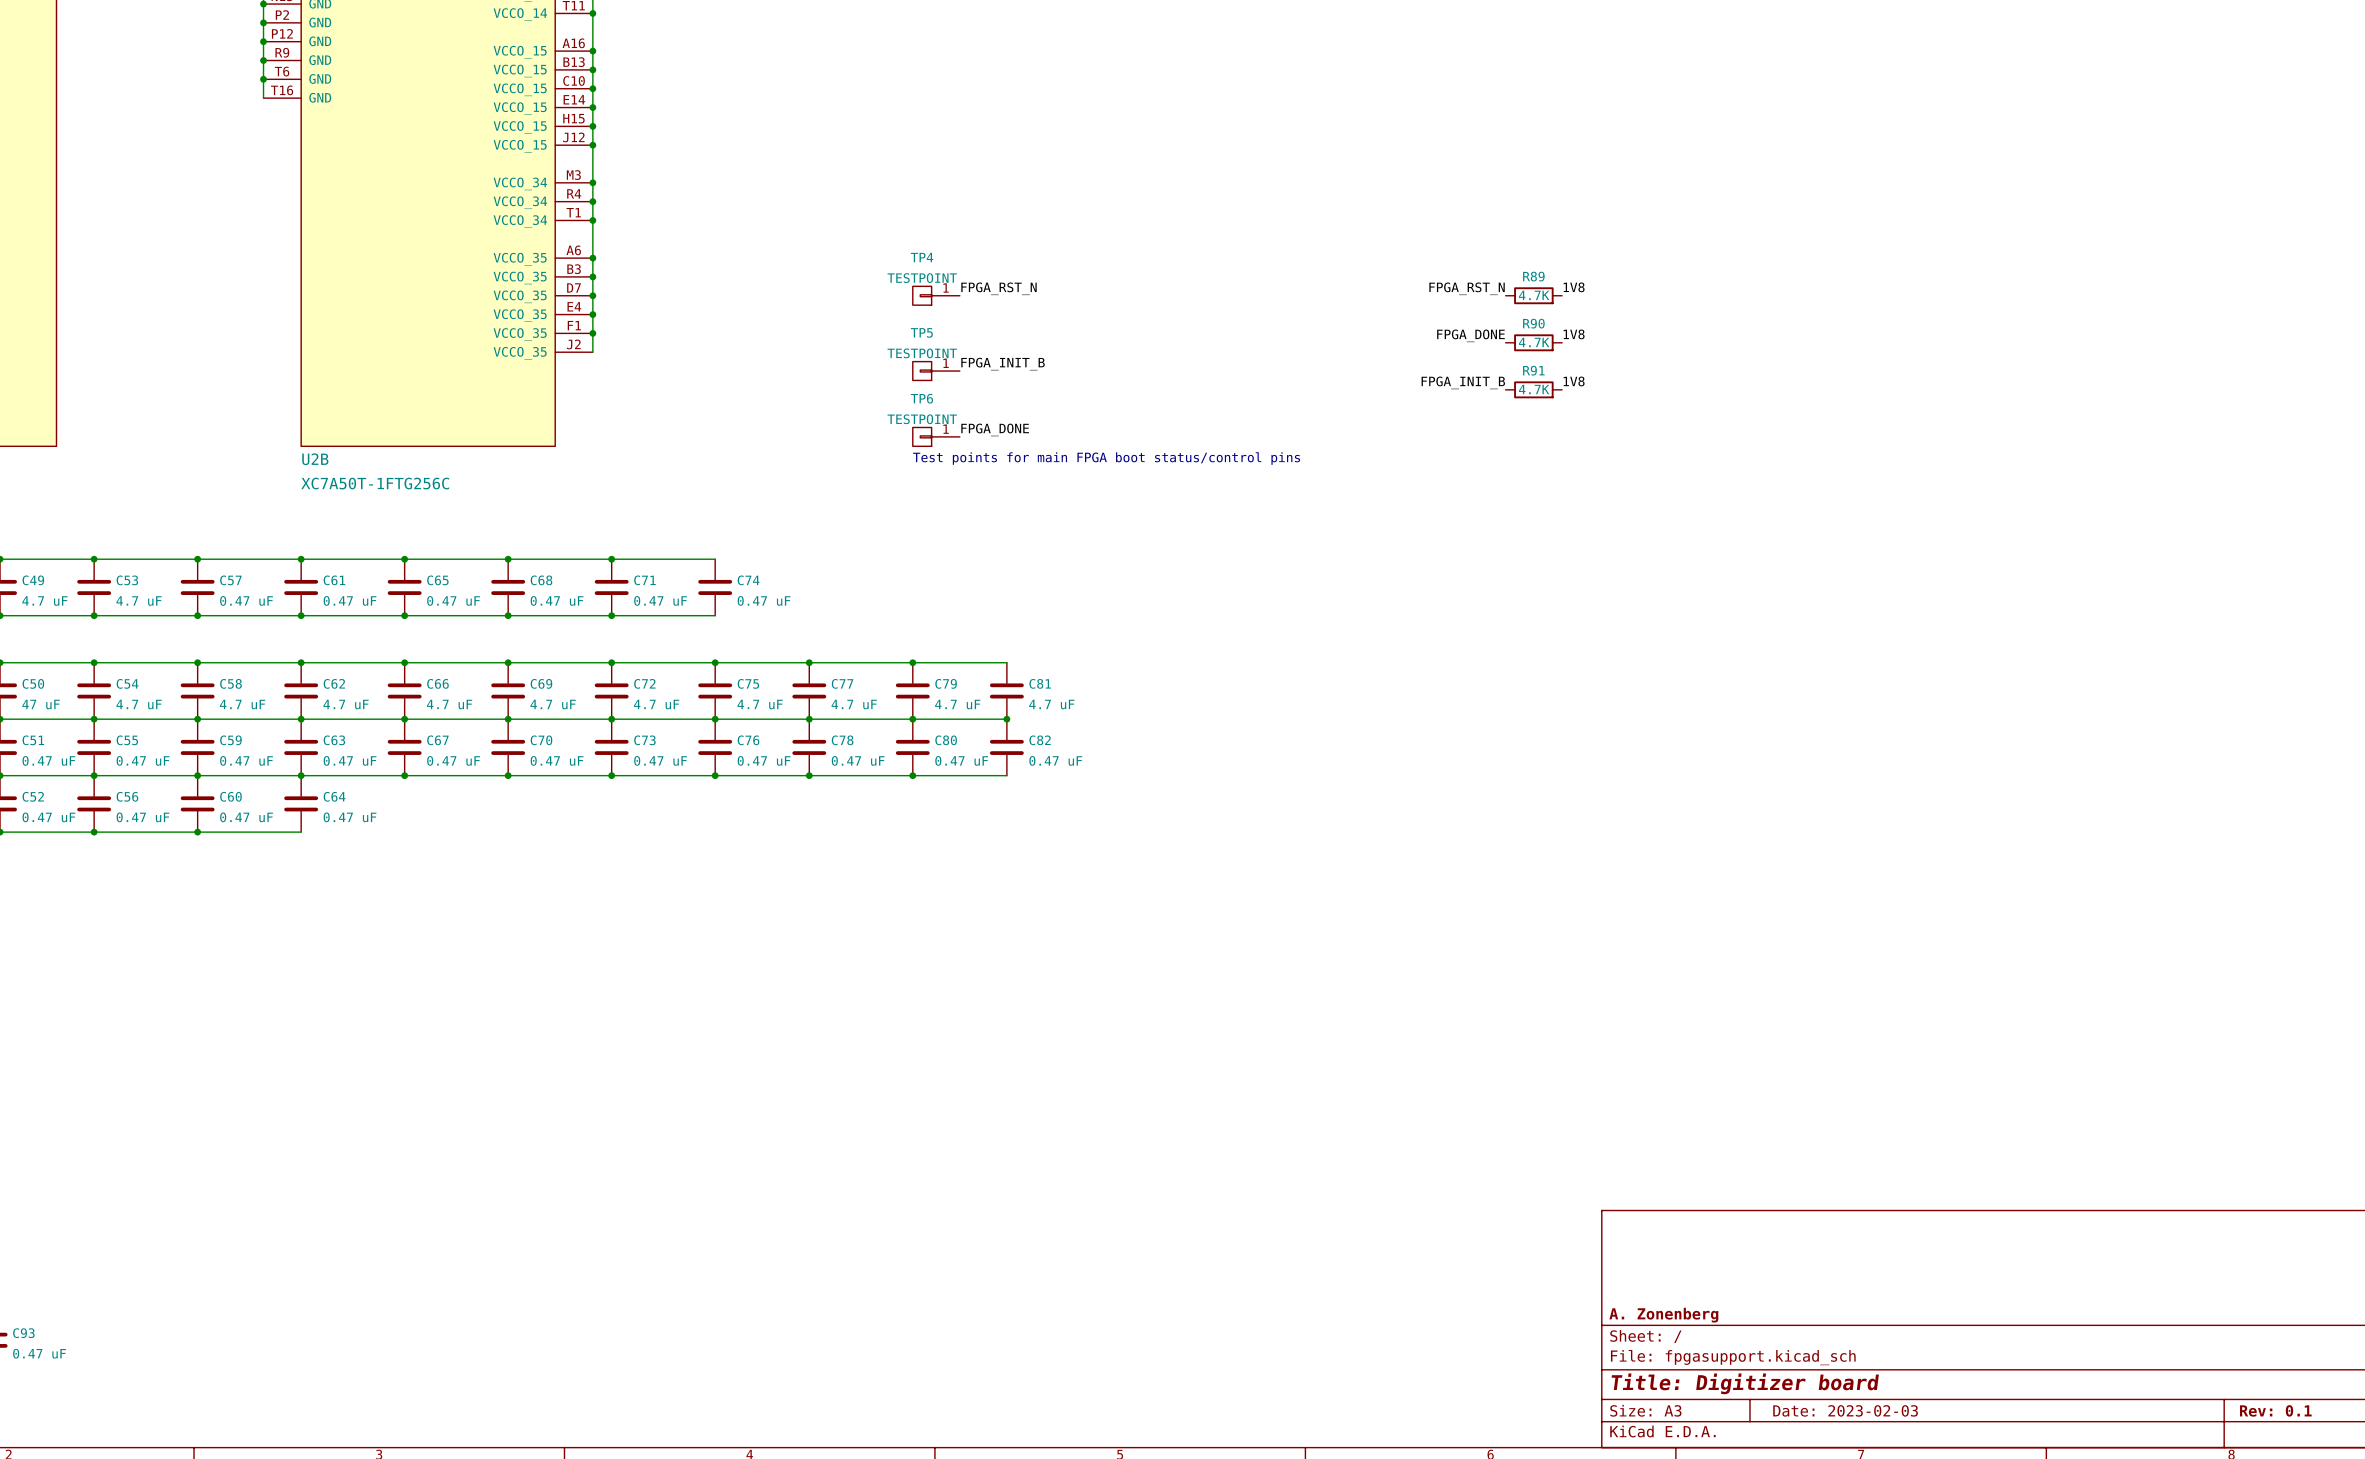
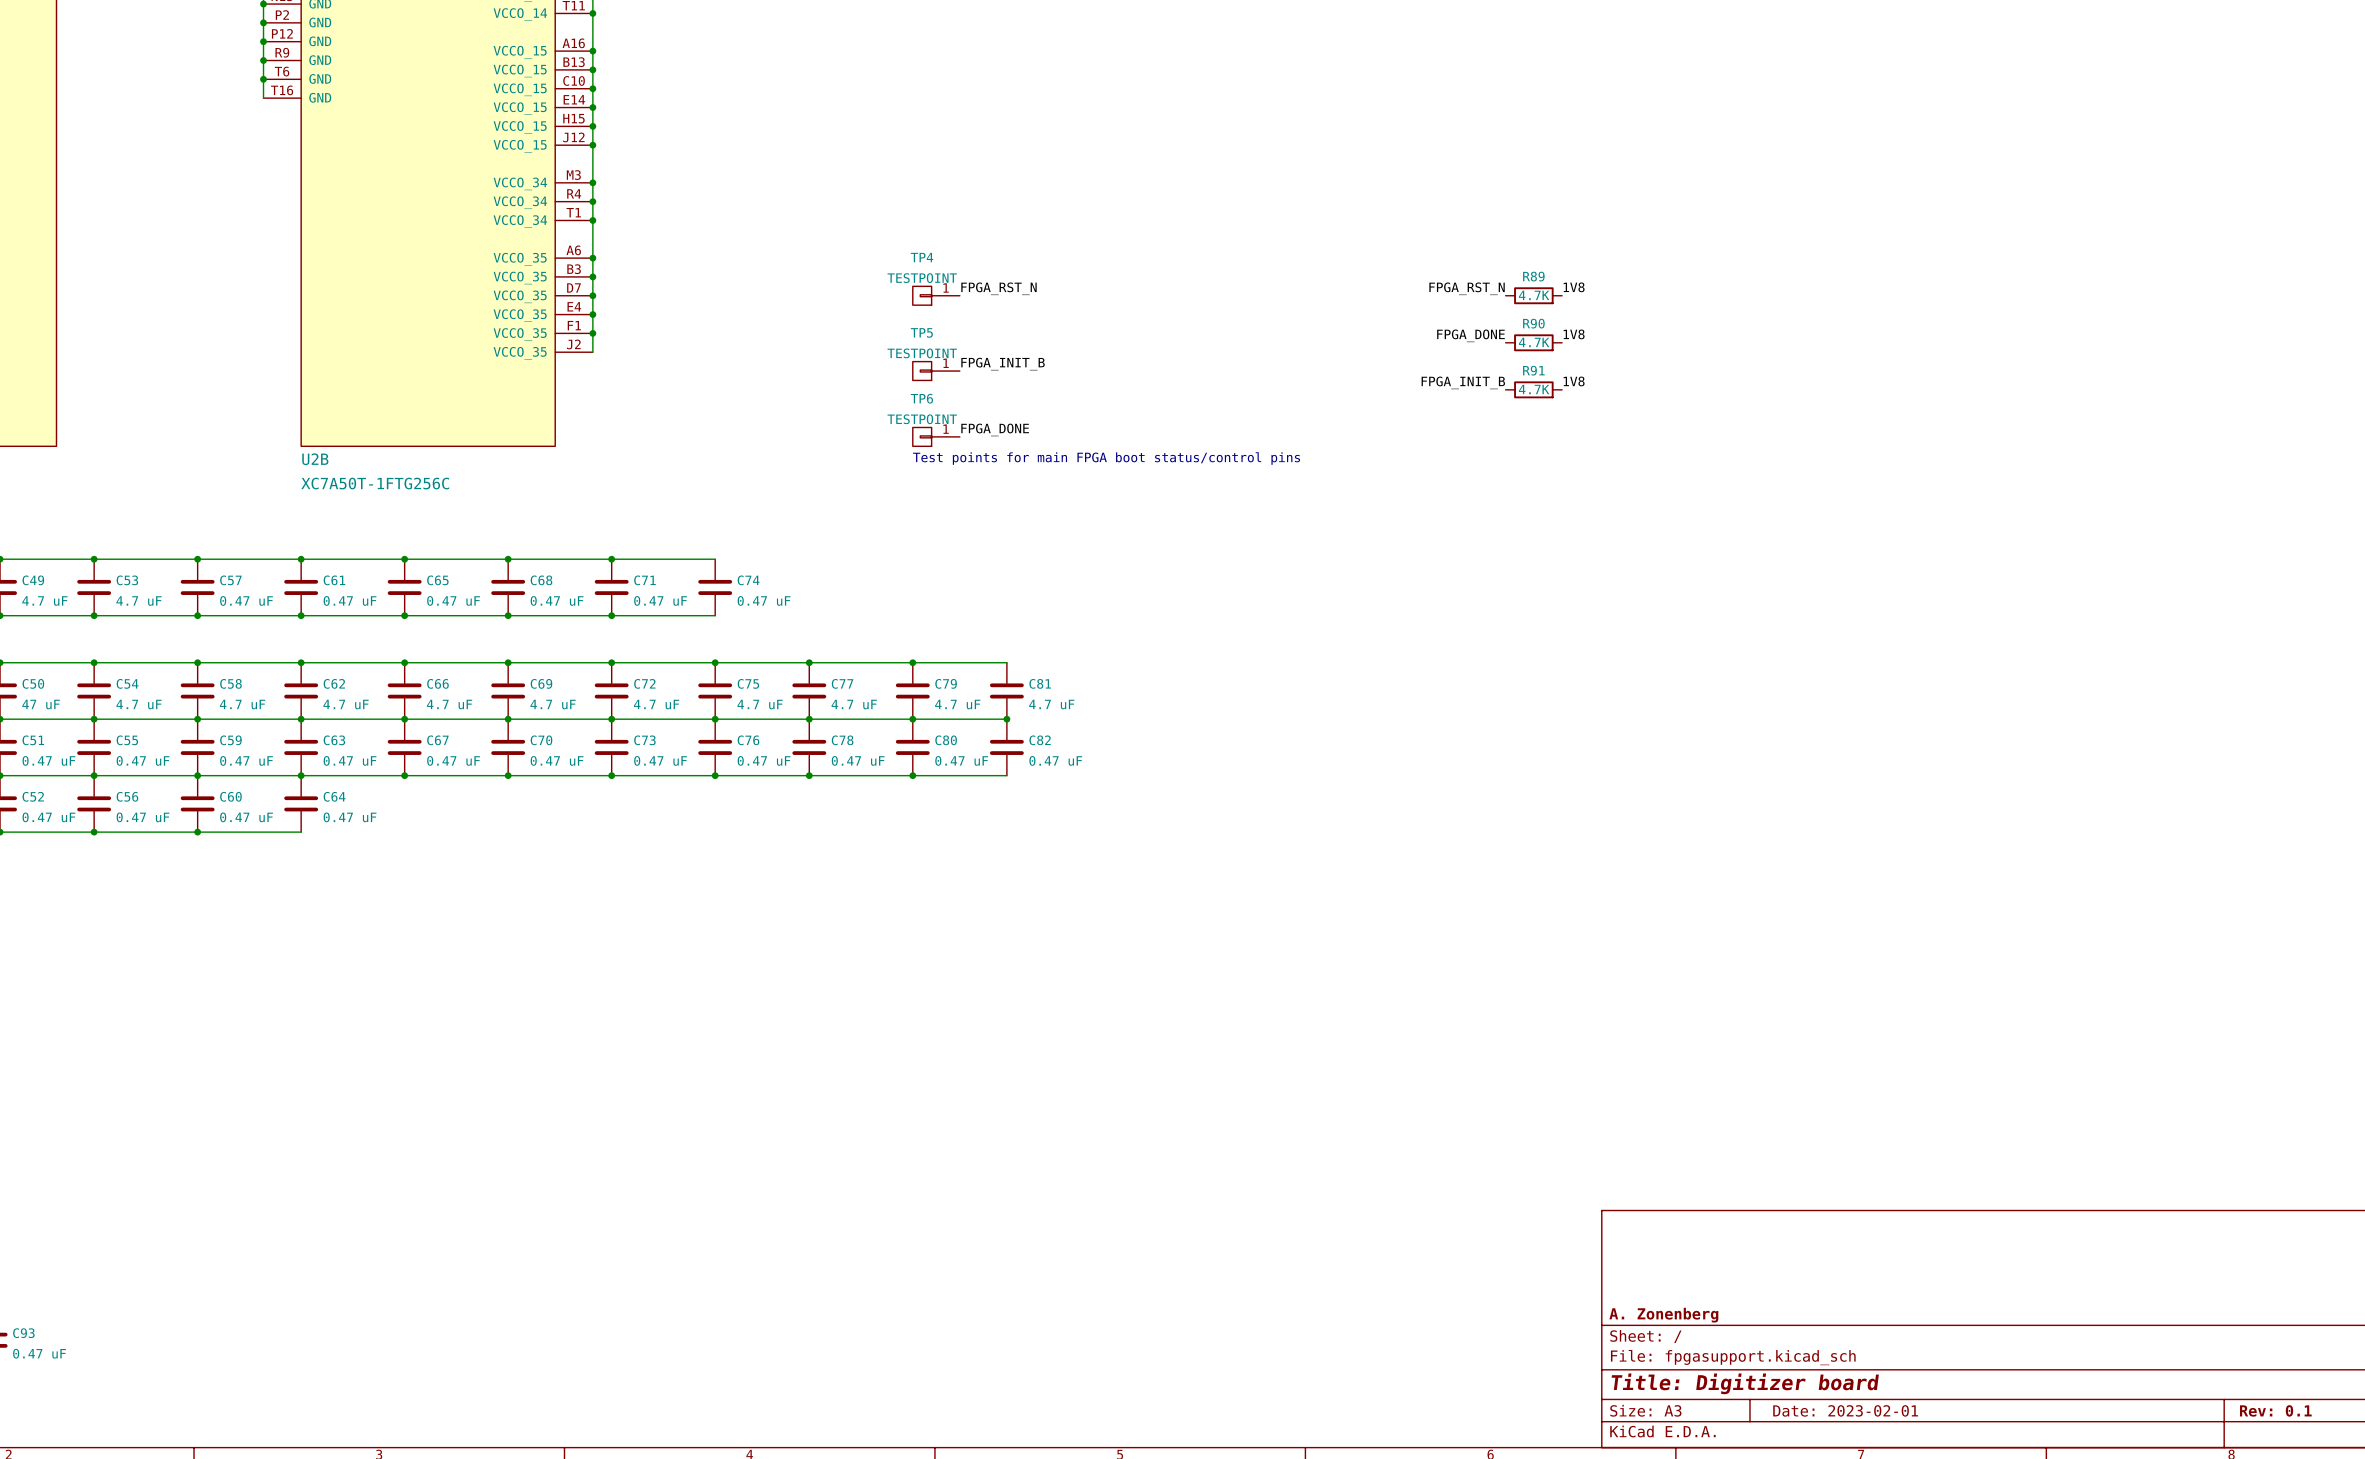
title block: Date: 2023-02-03 (1845, 1410) -> Date: 2023-02-01 (1845, 1410)

